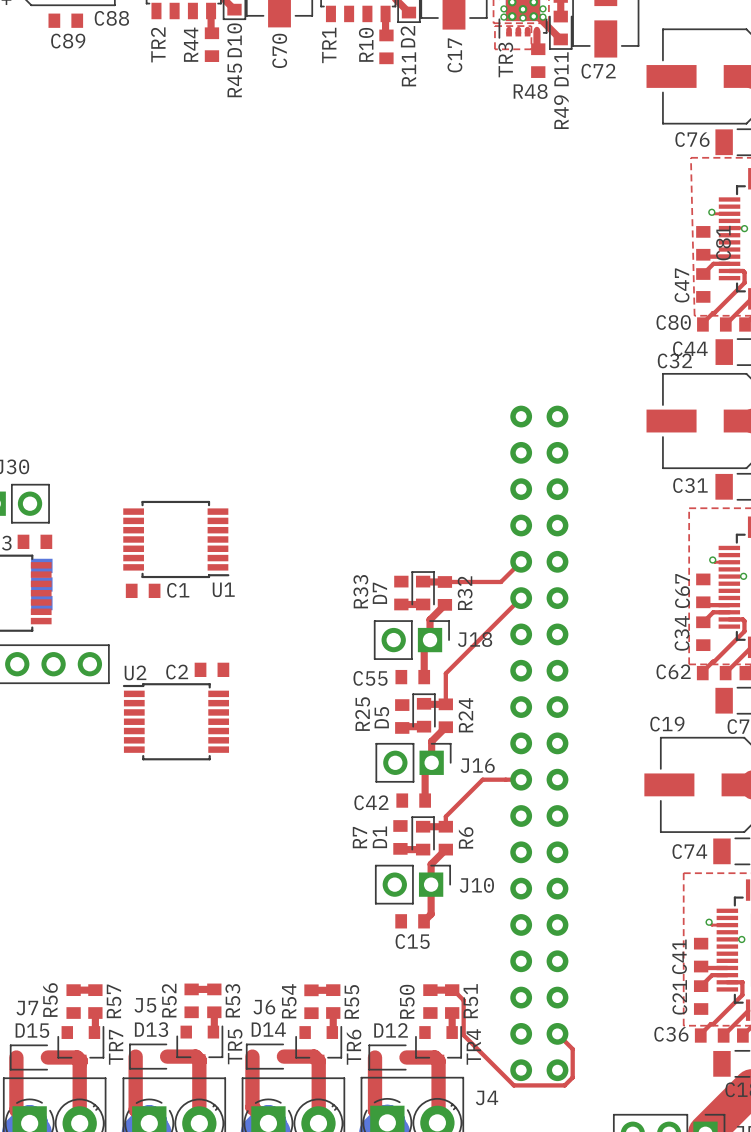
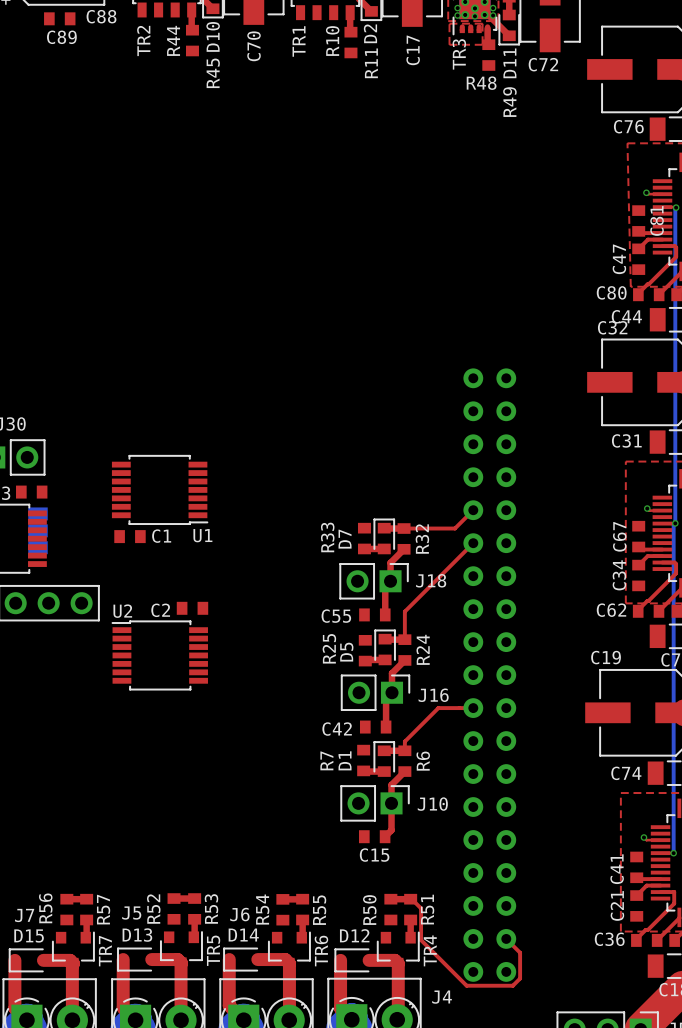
bottom track: none -> (676, 207) (673, 853)

